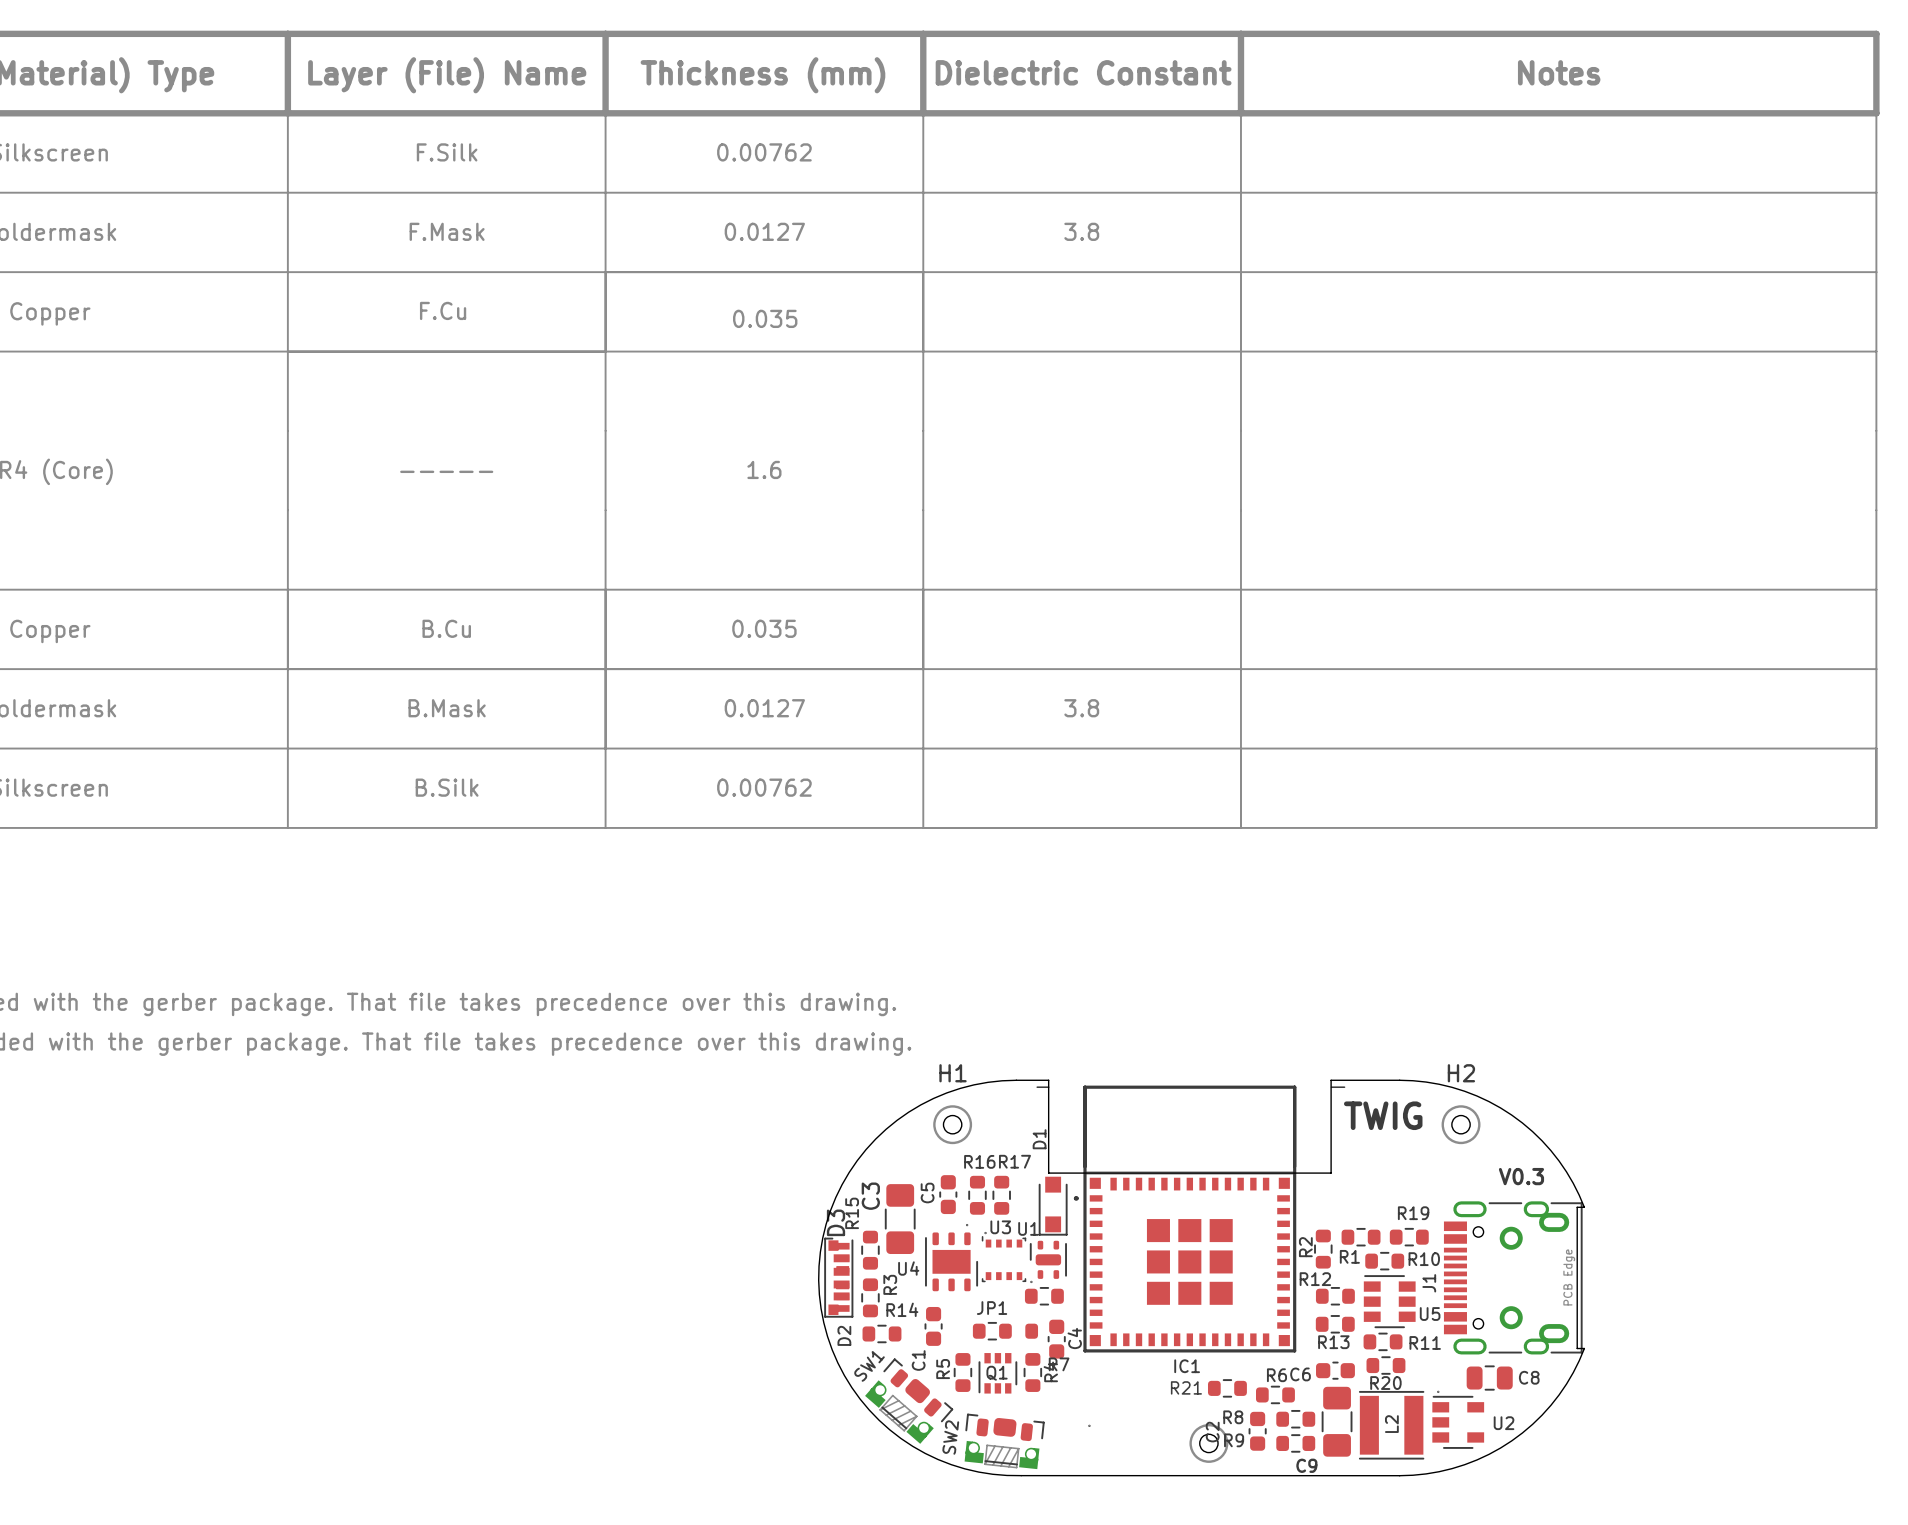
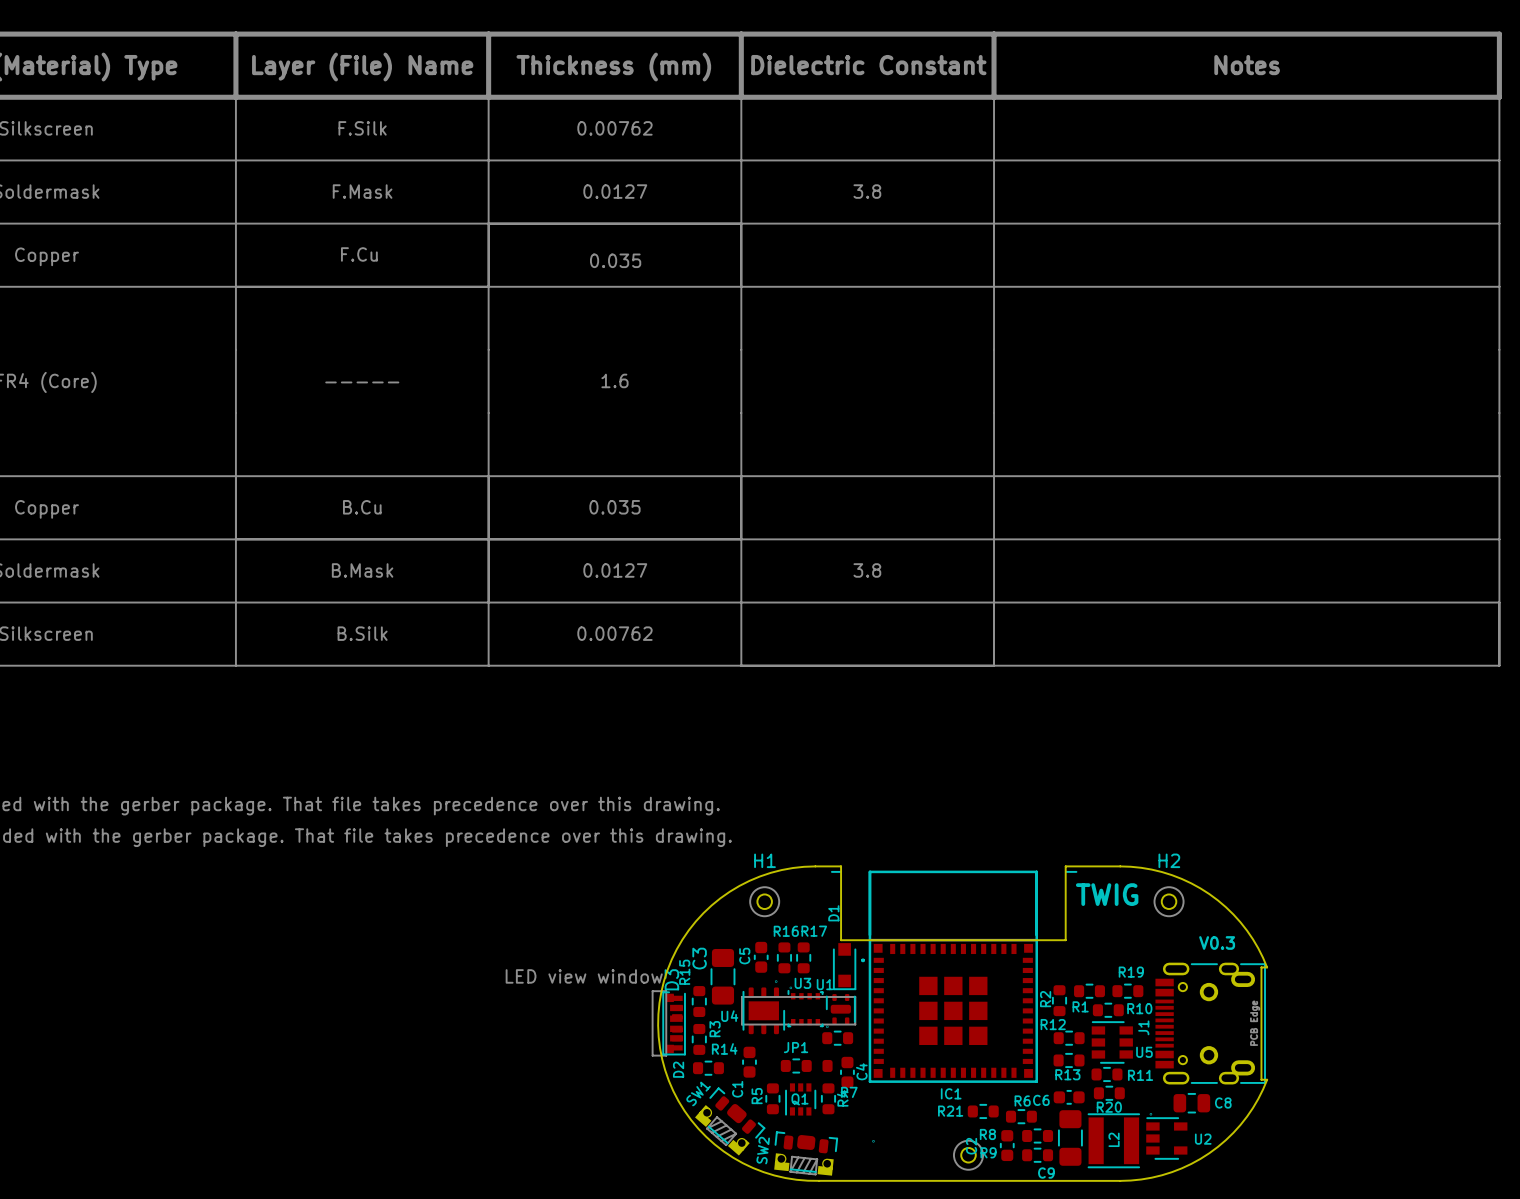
text: none -> LED view window (584, 976)
line: none -> (652, 991) (652, 1055) (666, 1055) (666, 991) (652, 991)
line: none -> (741, 996) (855, 996) (855, 1024) (741, 1024) (741, 996)

